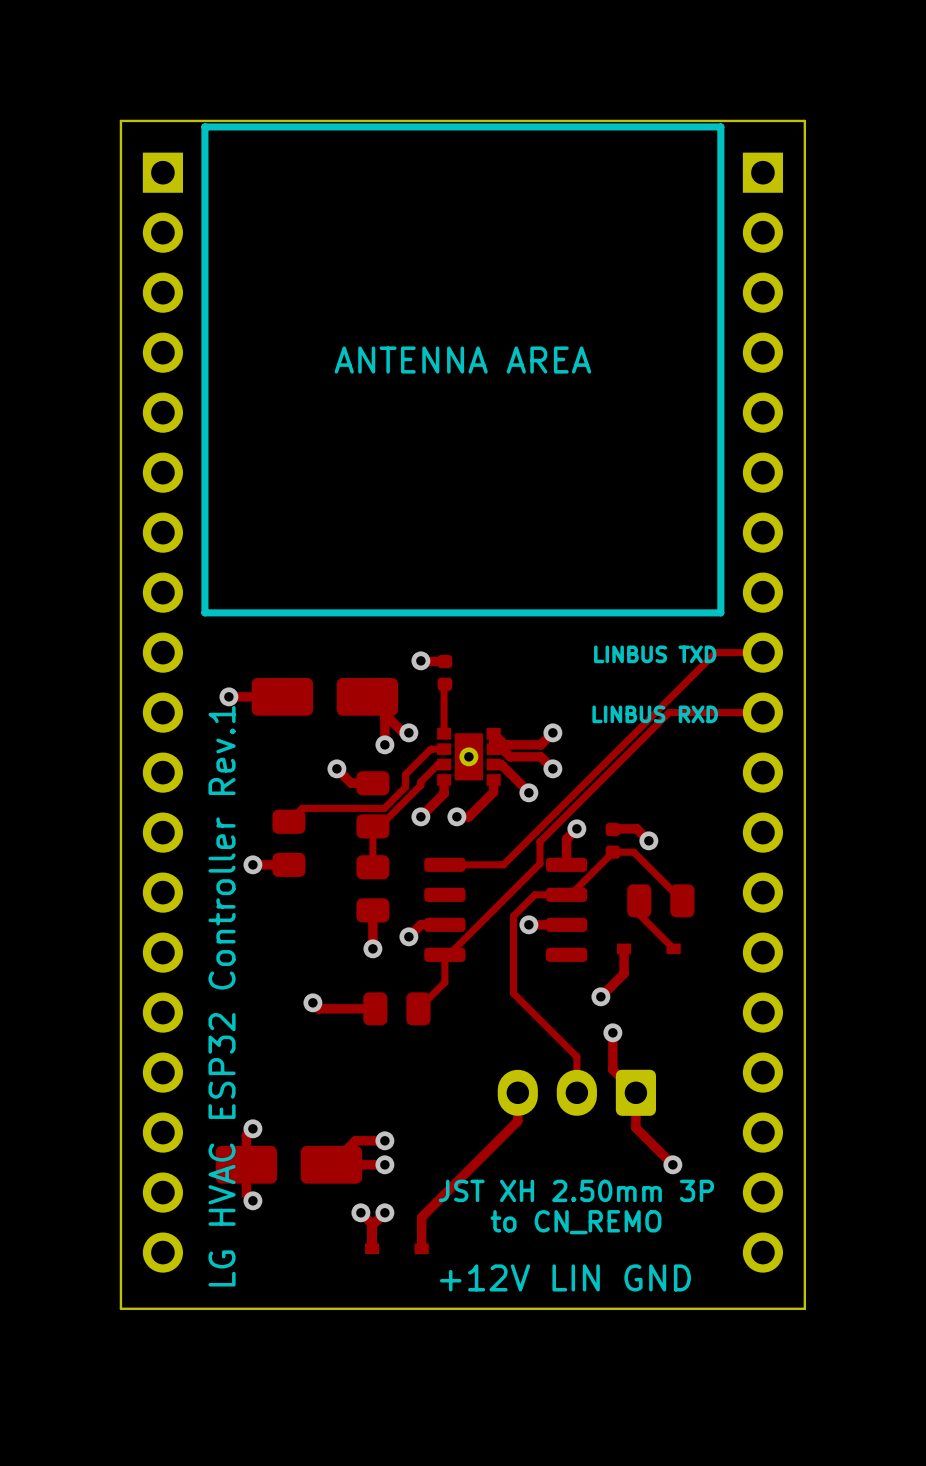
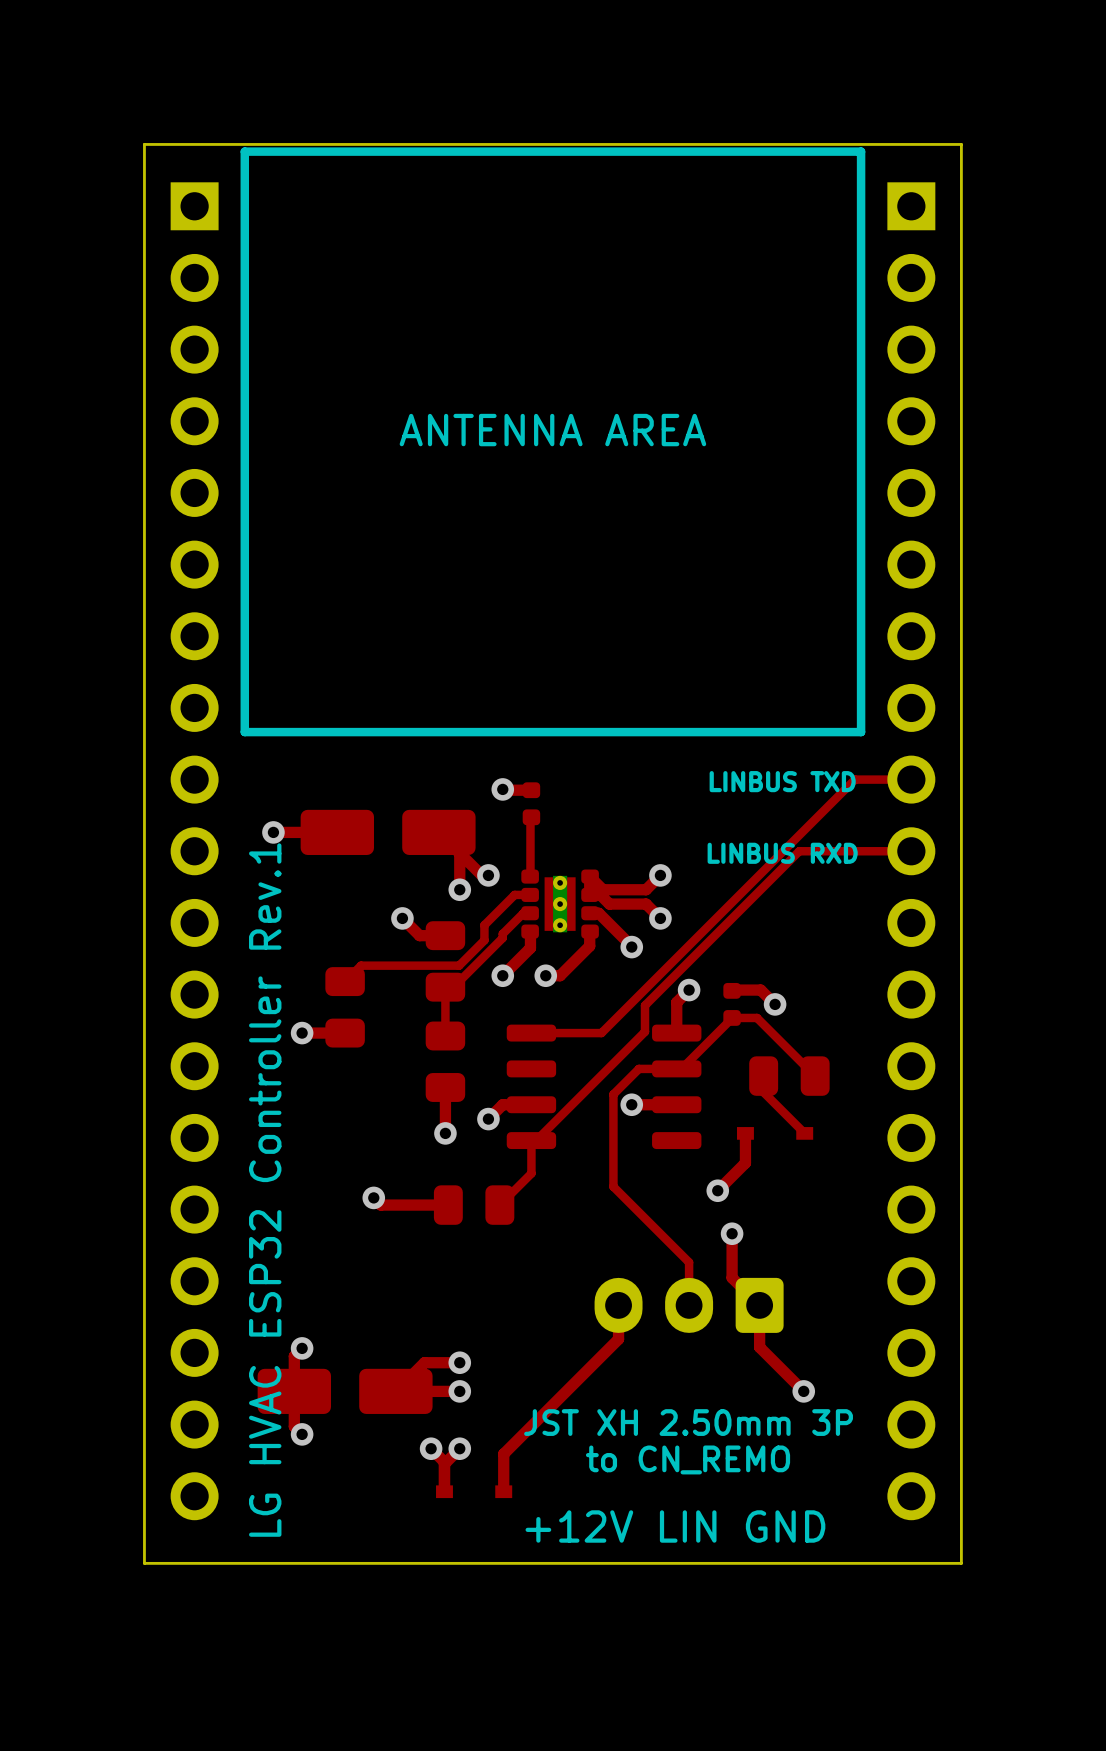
part footprint: [437, 727, 501, 786] -> [521, 869, 599, 939]

